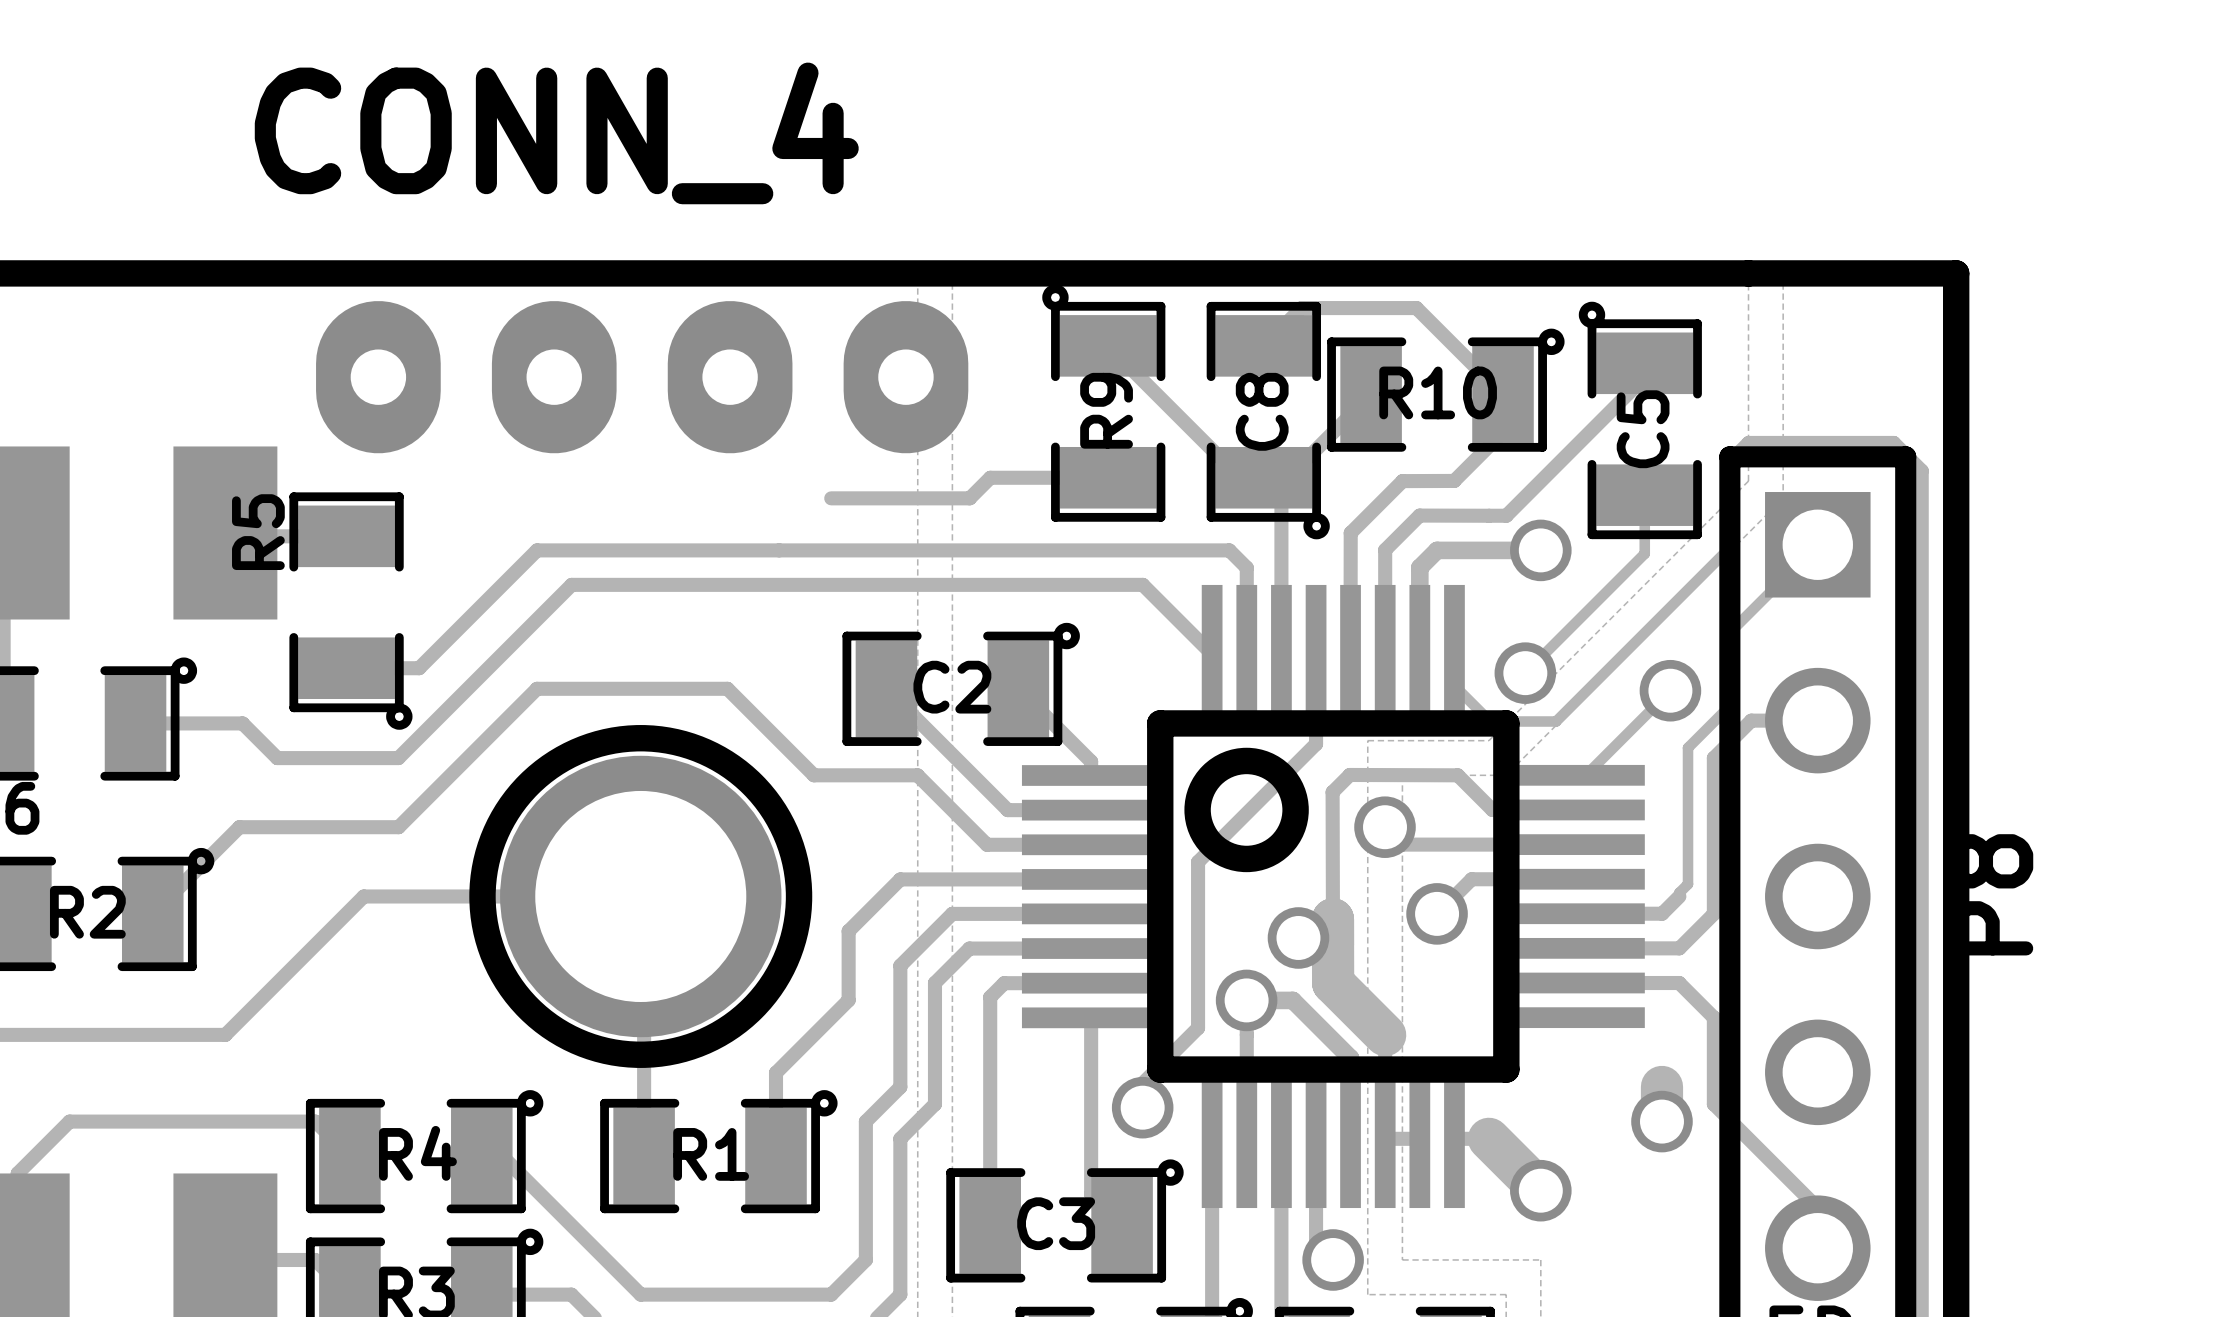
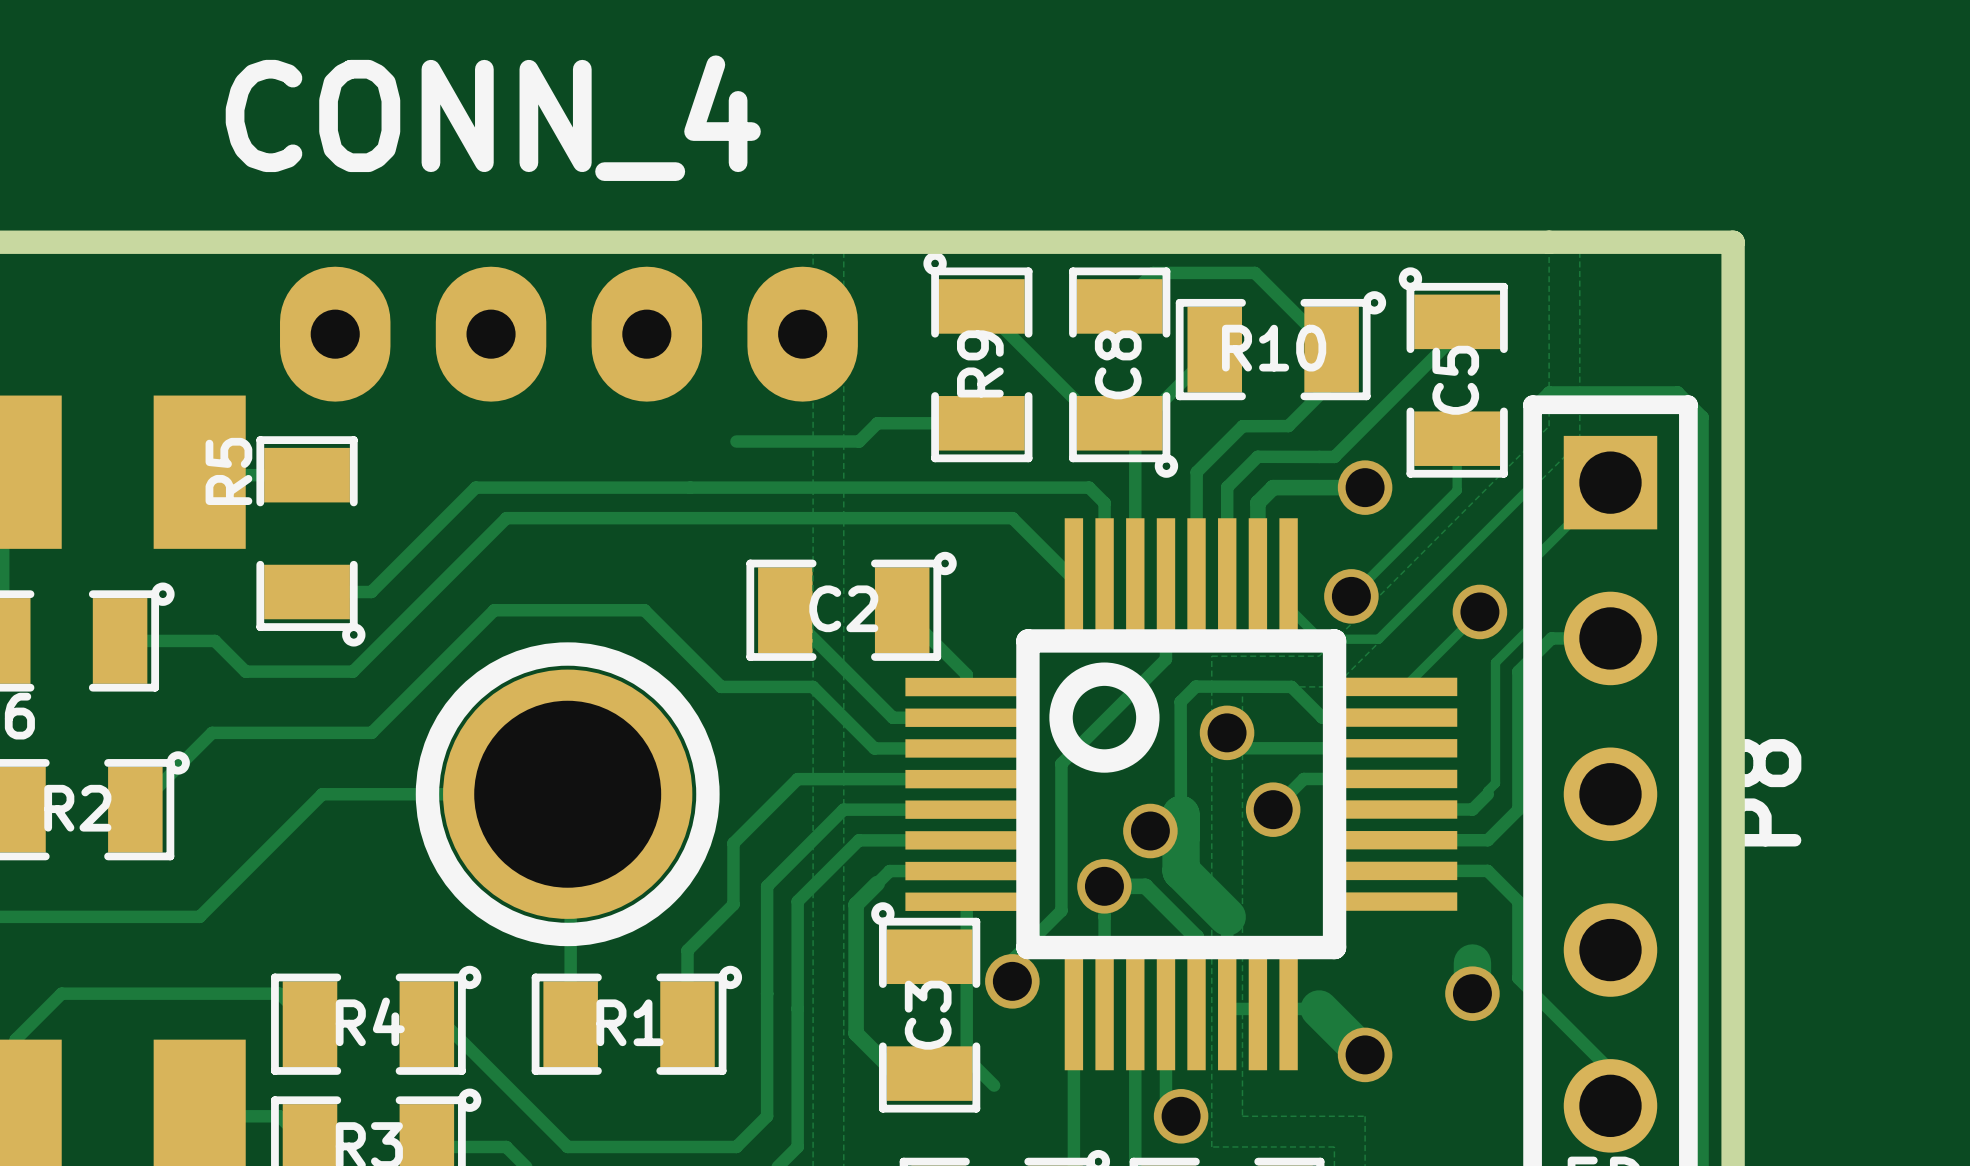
track: (557, 688) (537, 688) (398, 827) -> (494, 610) (371, 732) (353, 732)
track: (952, 913) (900, 965) (900, 1017) -> (858, 840) (797, 901)
track: none -> (843, 809) (767, 886) (767, 993)
track: (848, 931) (848, 1000) (827, 1020) -> (751, 824) (733, 843) (733, 904)
track: (969, 948) (934, 983) (934, 1104) (900, 1138) -> none
track: (990, 997) (990, 1225) -> (877, 883) (856, 904) (856, 1033) (896, 1073) (929, 1073)
track: (900, 1087) (865, 1121) -> (797, 963) (797, 1008)
C3 rotation: 0° (1064, 1220) -> 90° counterclockwise (925, 1007)

